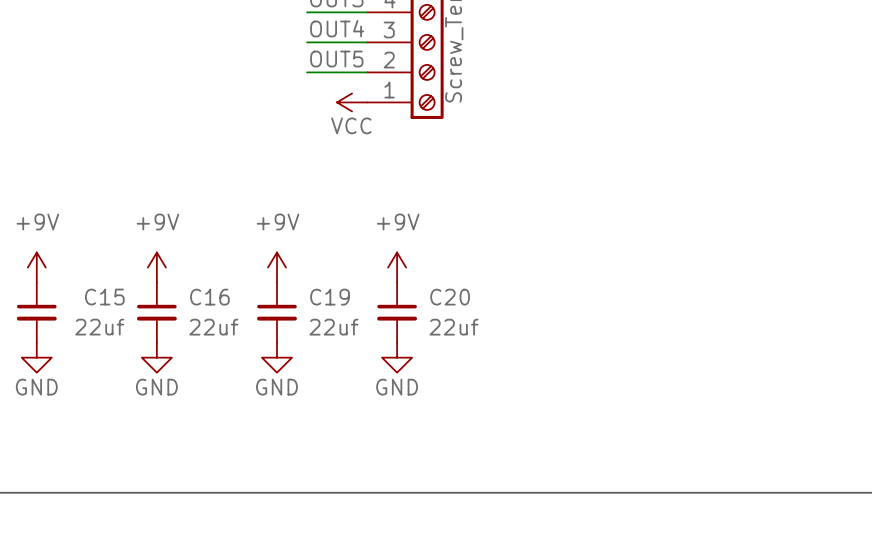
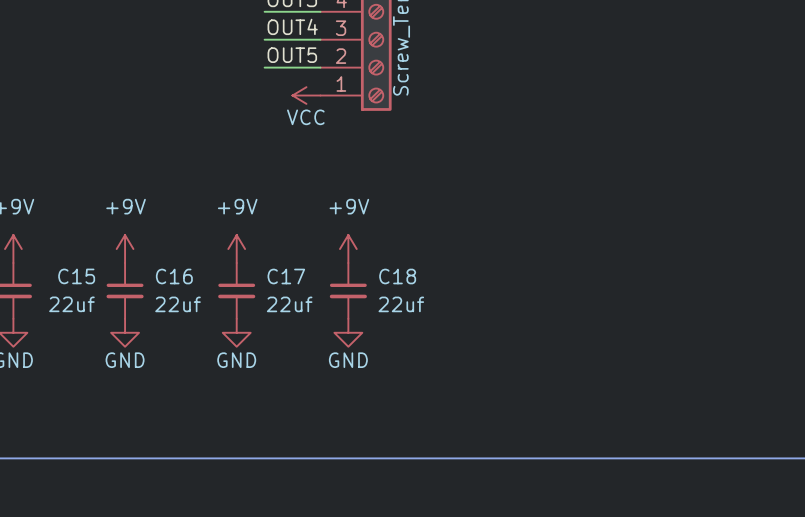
C19 name: C19 (330, 297) -> C17 (286, 276)
C20 name: C20 (450, 297) -> C18 (397, 276)

